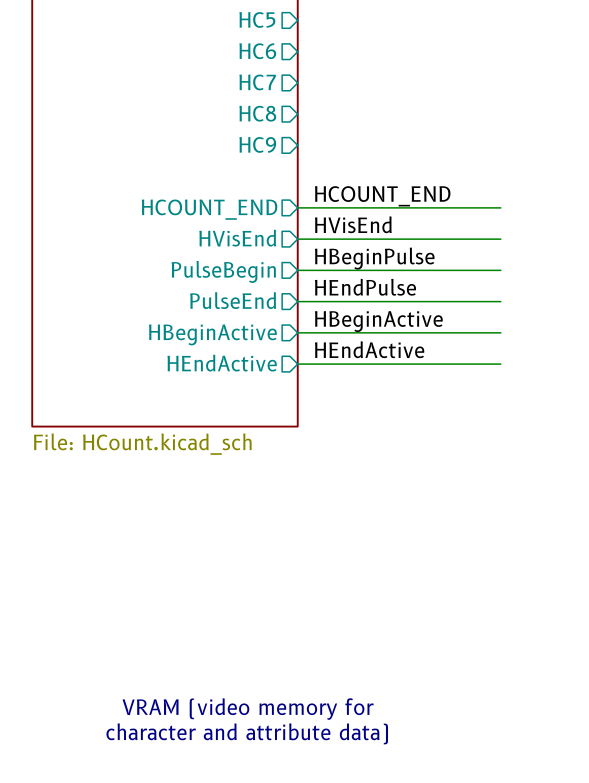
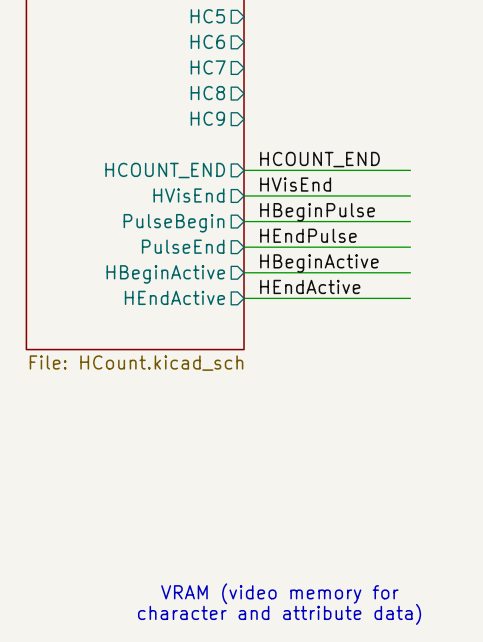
text position: VRAM (video memory for (248, 709) -> VRAM (video memory for (279, 593)
text position: character and attribute data) (247, 733) -> character and attribute data) (279, 614)

